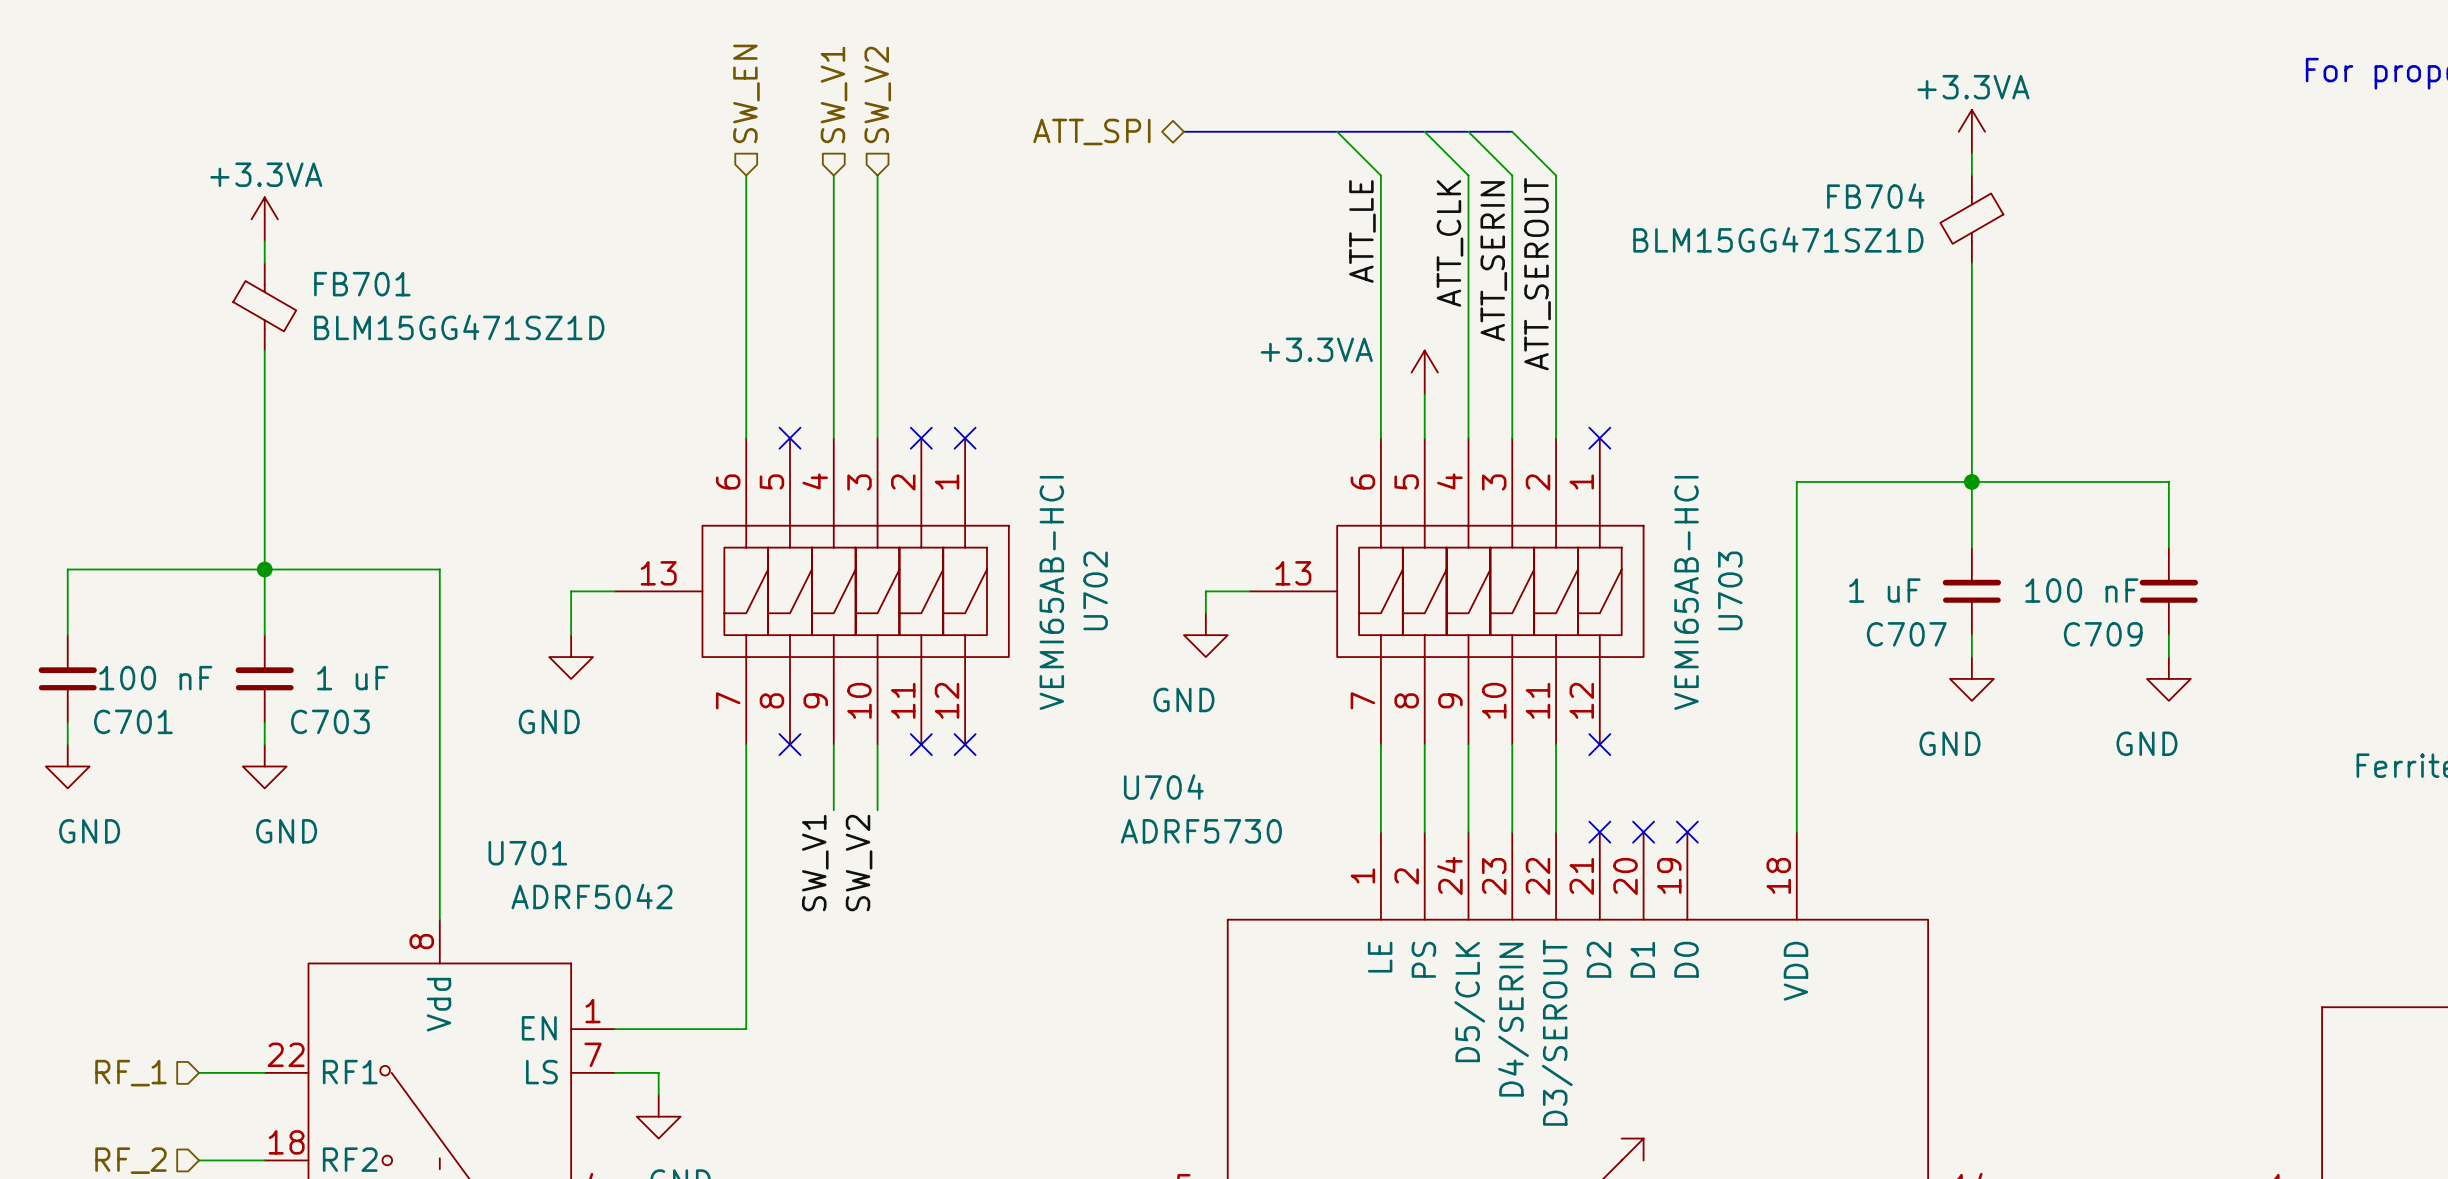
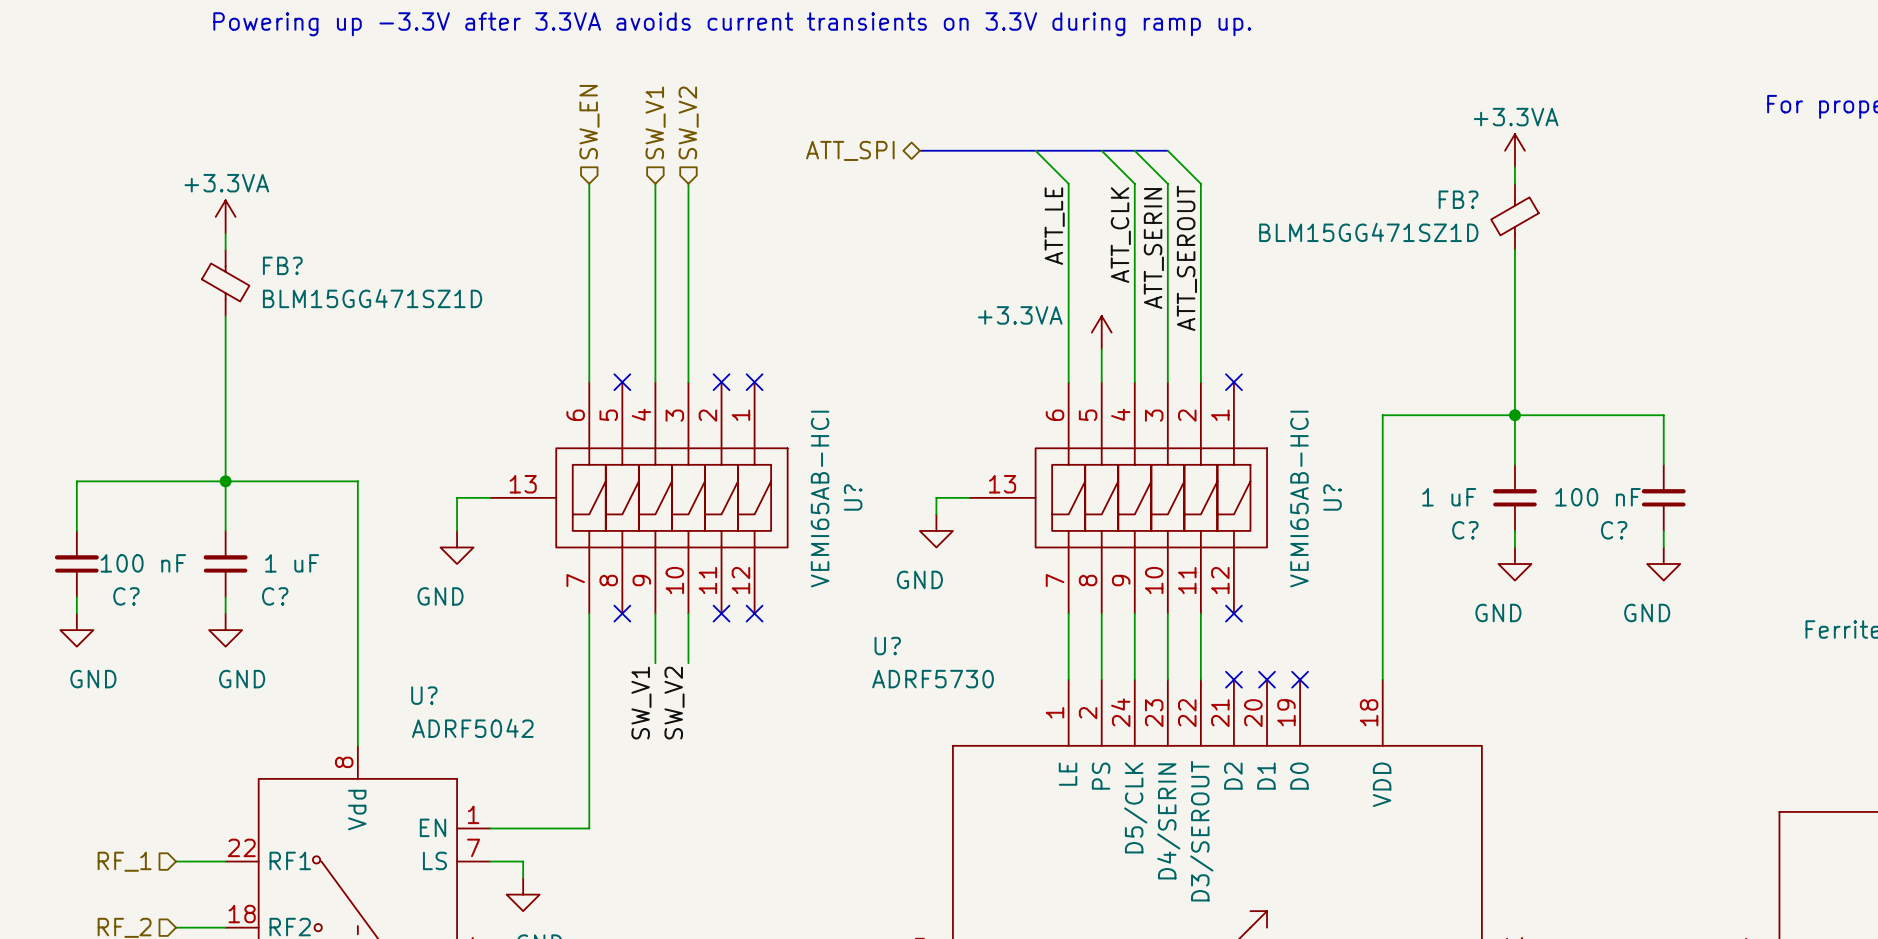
FB704 name: FB704 (1875, 196) -> FB? (1458, 199)
FB701 name: FB701 (362, 284) -> FB? (282, 265)
U702 name: U702 (1095, 590) -> U? (853, 497)
U703 name: U703 (1730, 590) -> U? (1332, 497)
C707 name: C707 (1906, 634) -> C? (1465, 530)
C709 name: C709 (2103, 634) -> C? (1614, 530)
C701 name: C701 (133, 721) -> C? (126, 596)
C703 name: C703 (330, 721) -> C? (275, 596)
U704 name: U704 (1163, 787) -> U? (887, 646)
U701 name: U701 (527, 853) -> U? (424, 695)

